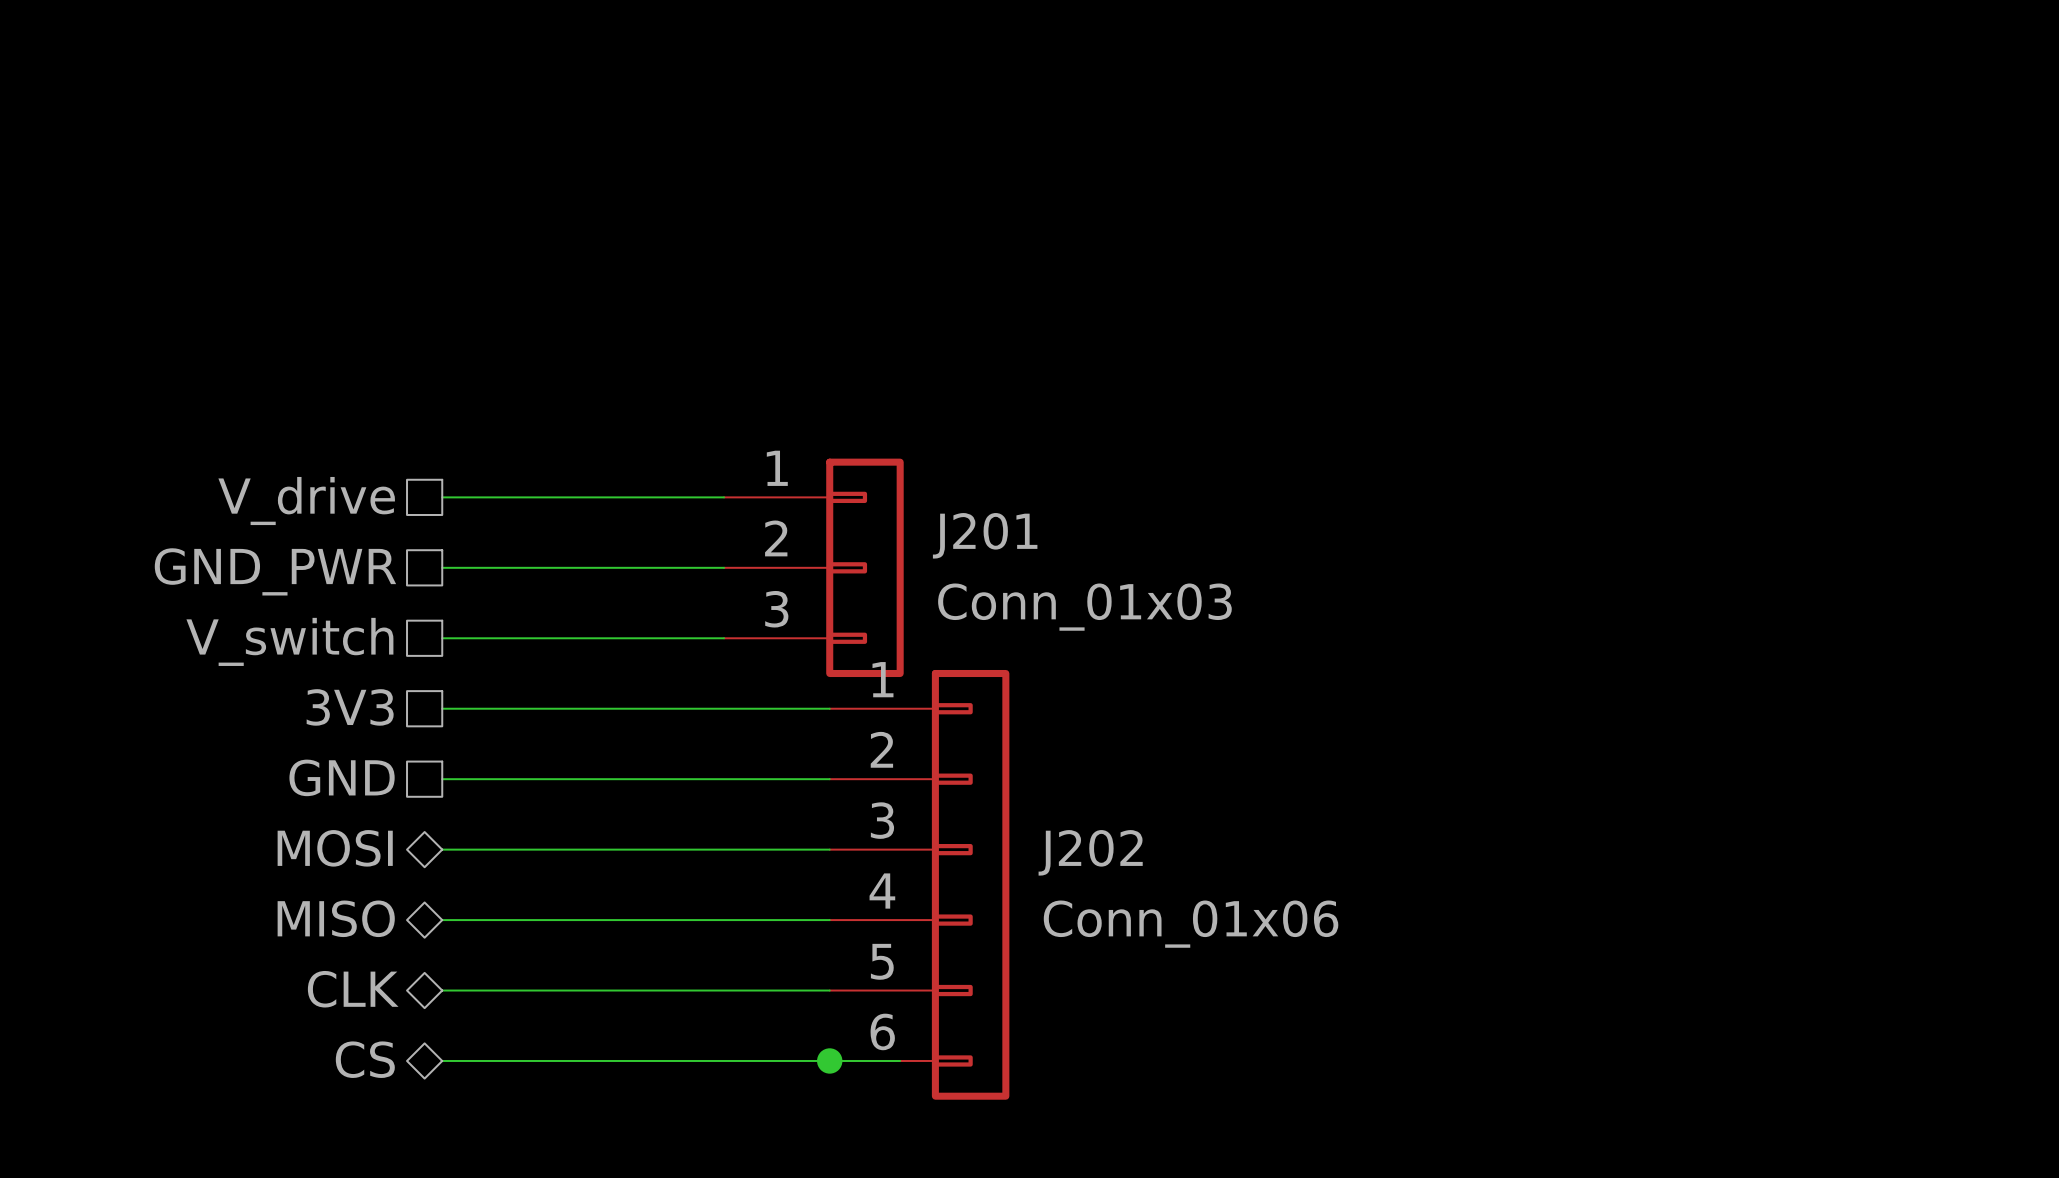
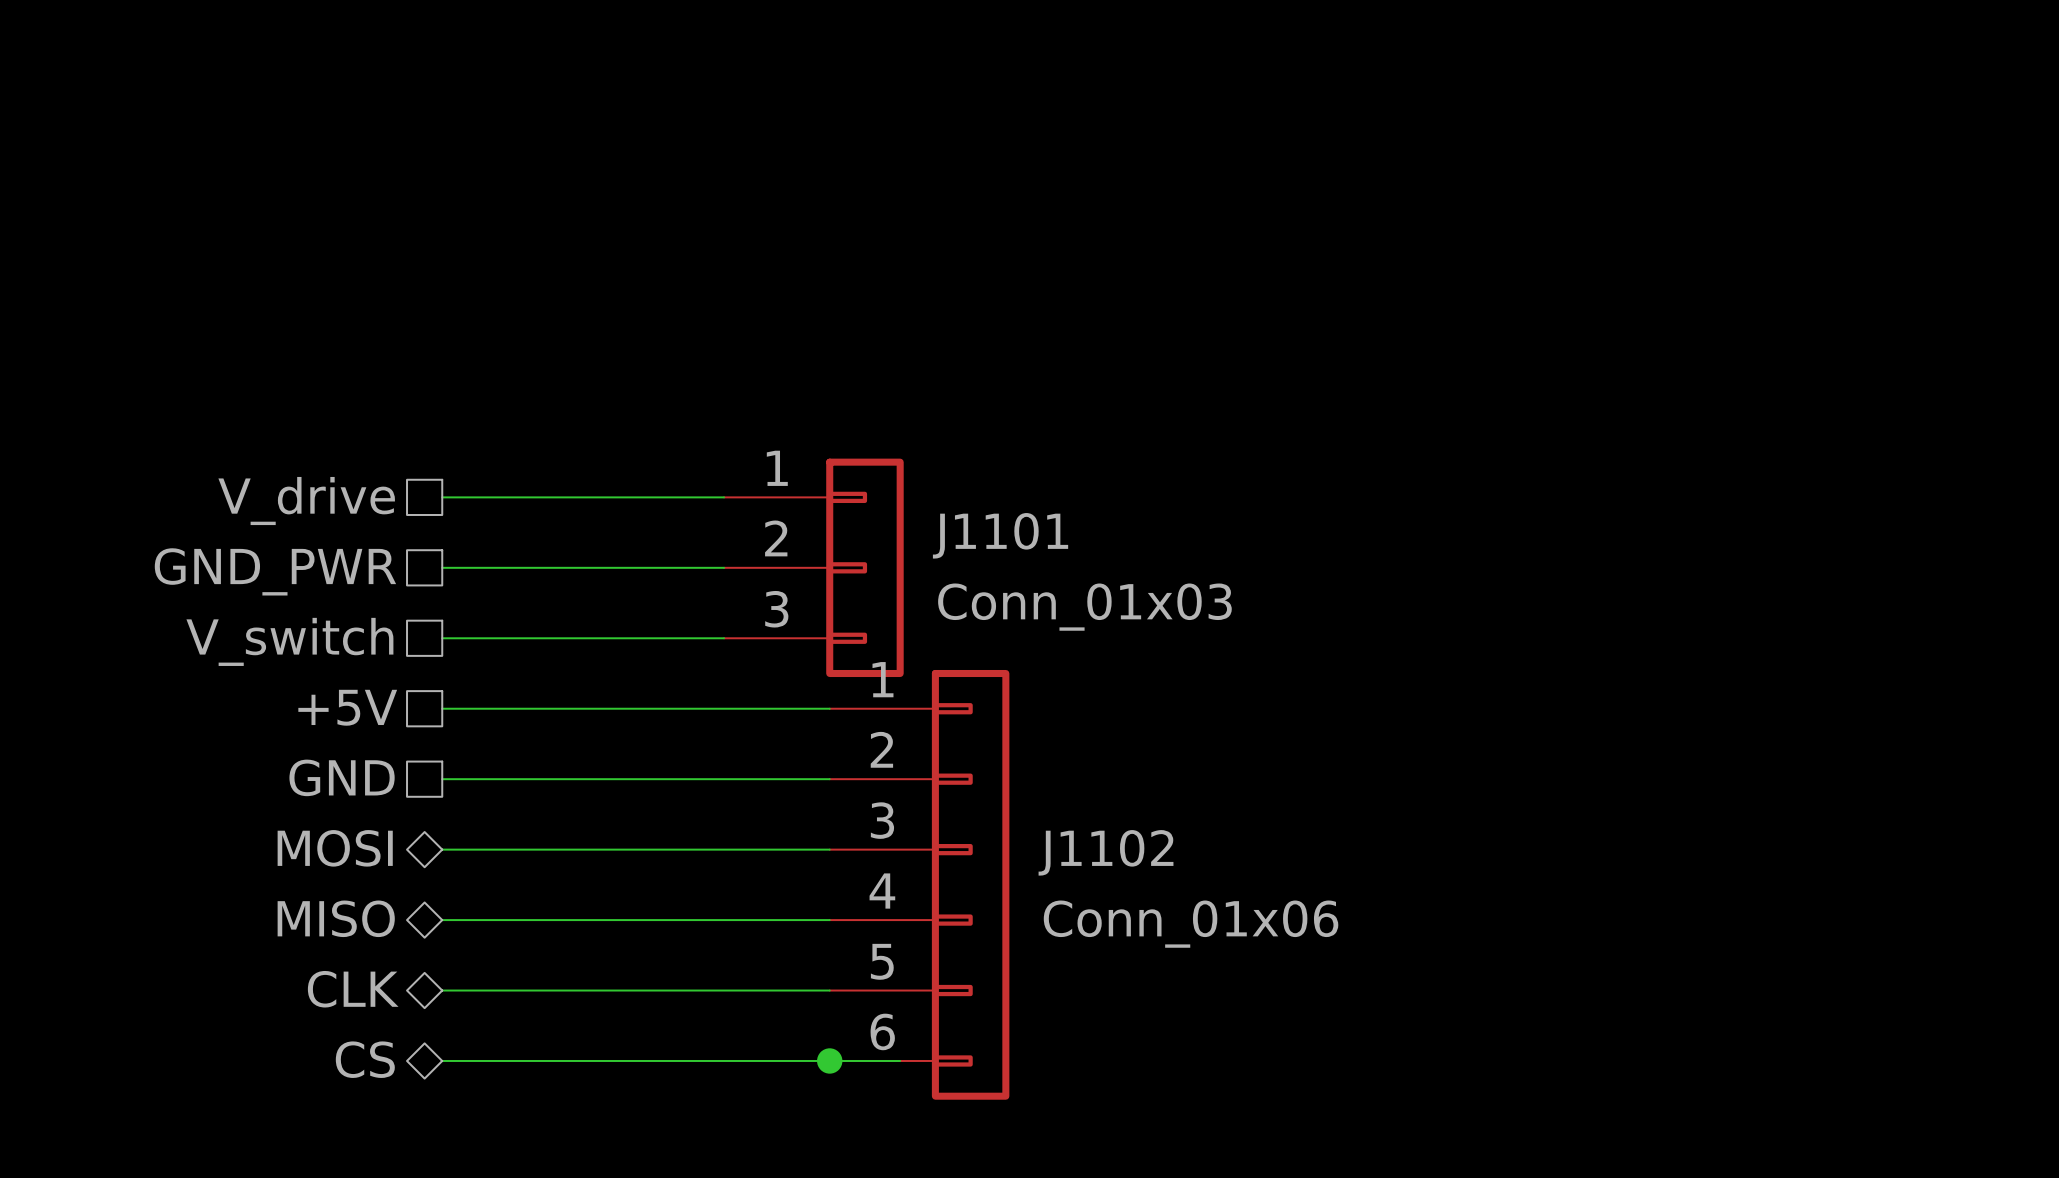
J201 name: J201 (985, 535) -> J1101 (1000, 535)
hierarchical label: 3V3 (350, 707) -> +5V (347, 707)
J202 name: J202 (1090, 852) -> J1102 (1106, 852)

